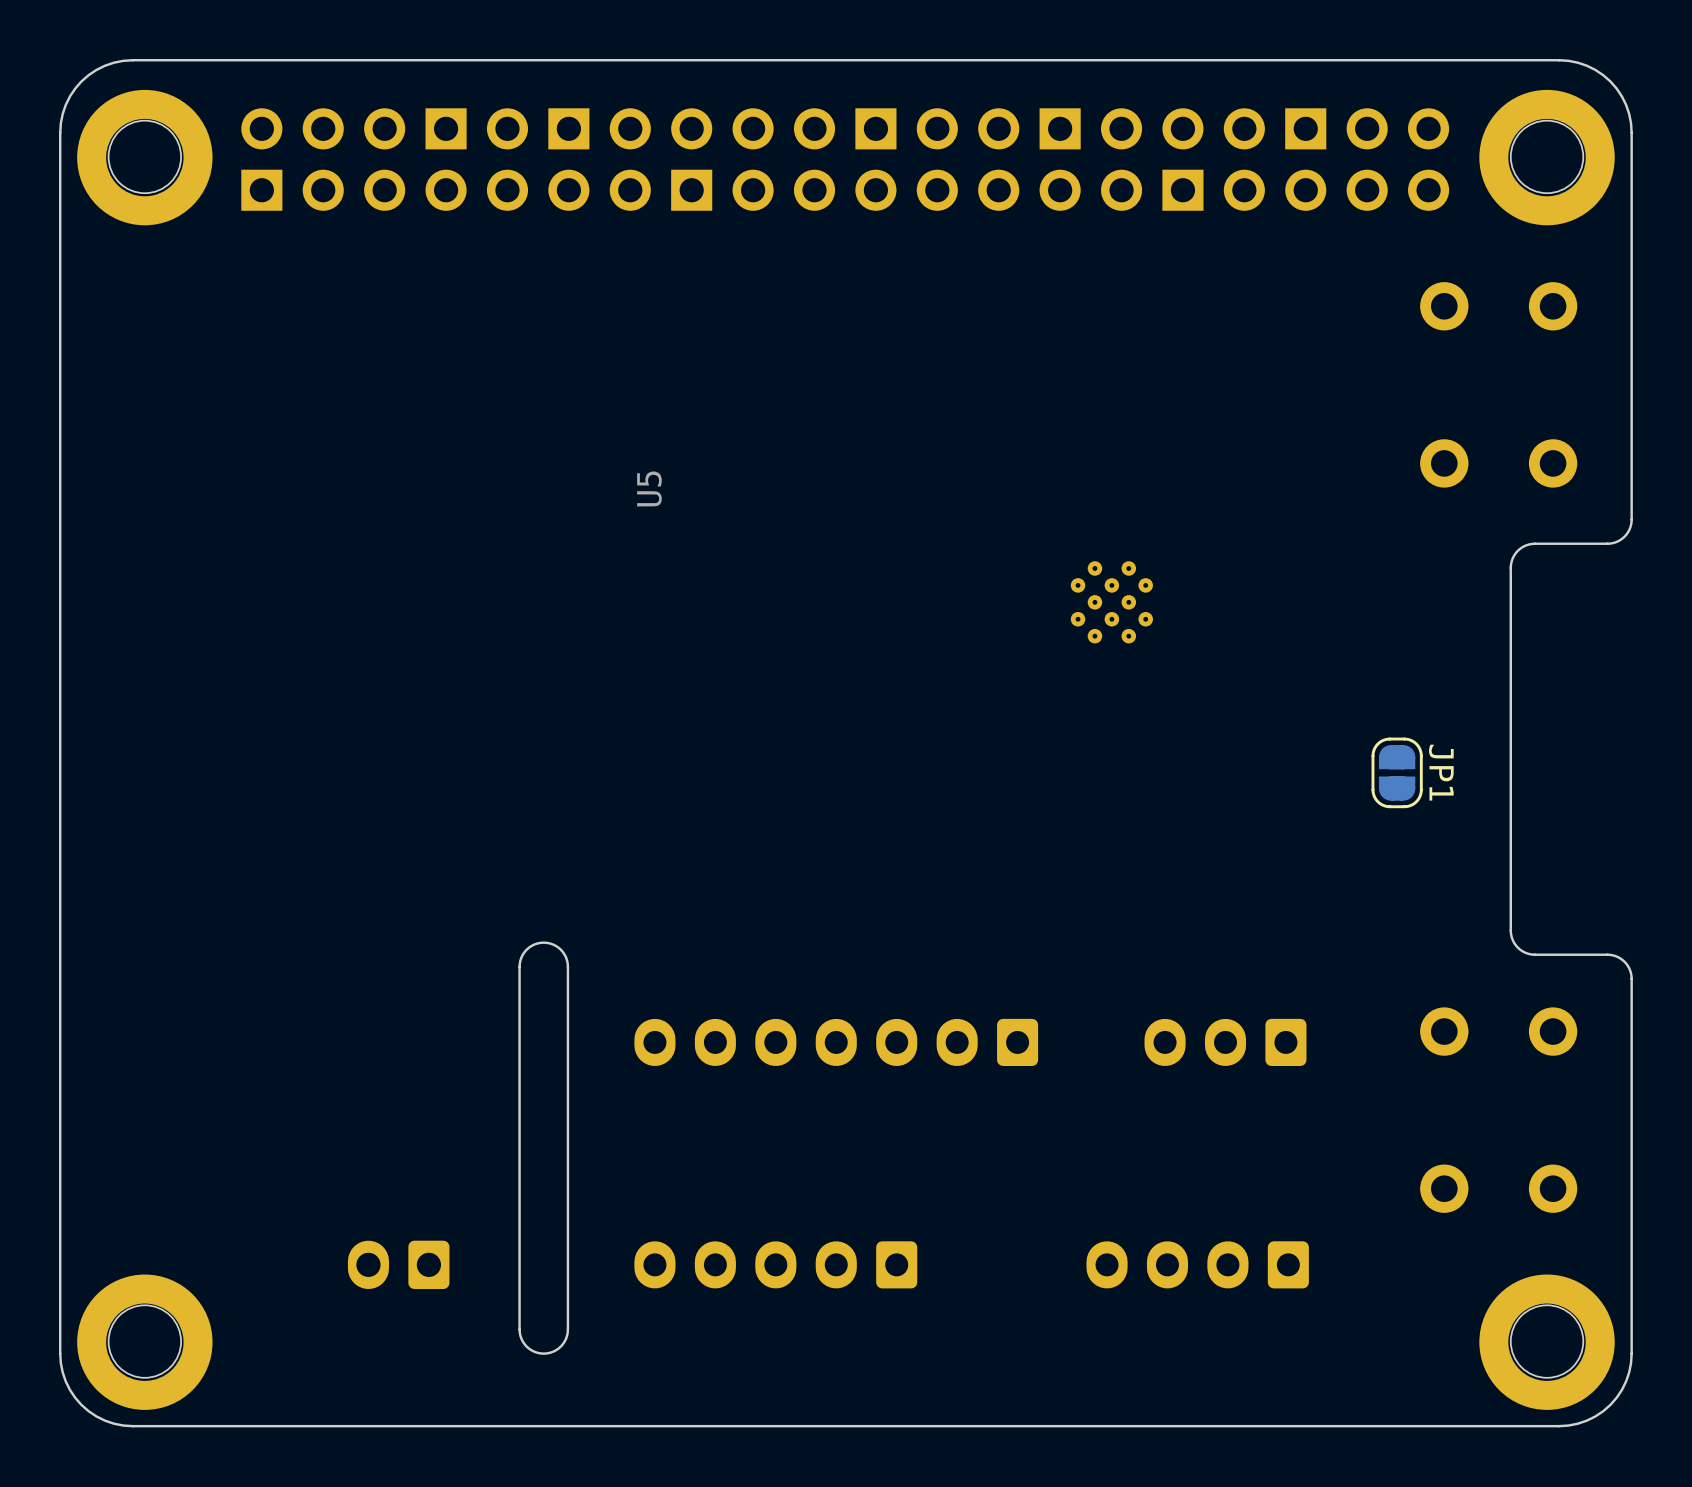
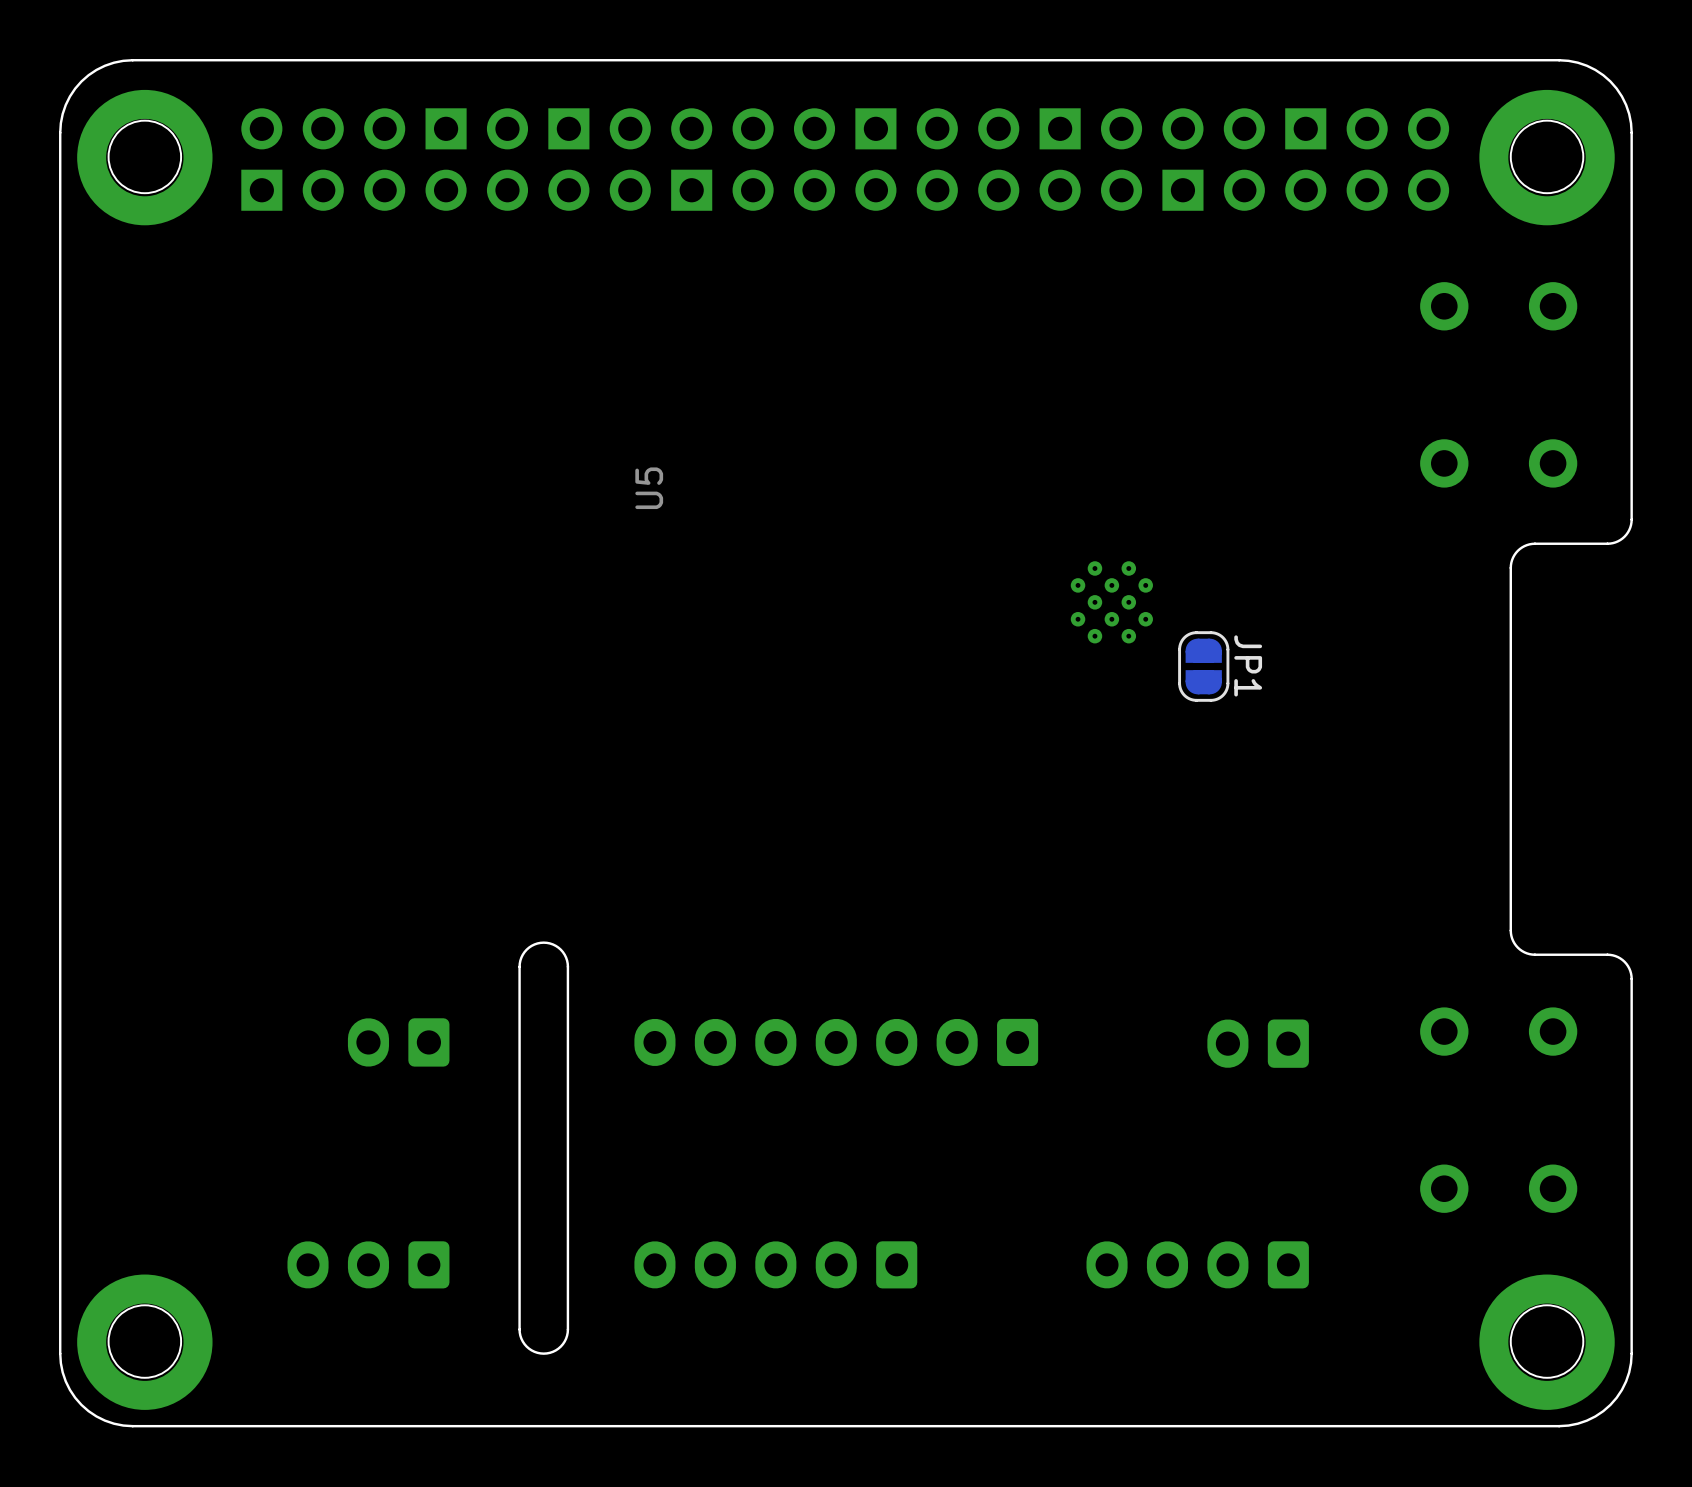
JP1 position: (1397, 772) -> (1203, 666)
part: (1225, 1042) -> none
part: none -> (1258, 1043)
part: none -> (368, 1264)
part position: (398, 1264) -> (398, 1042)

